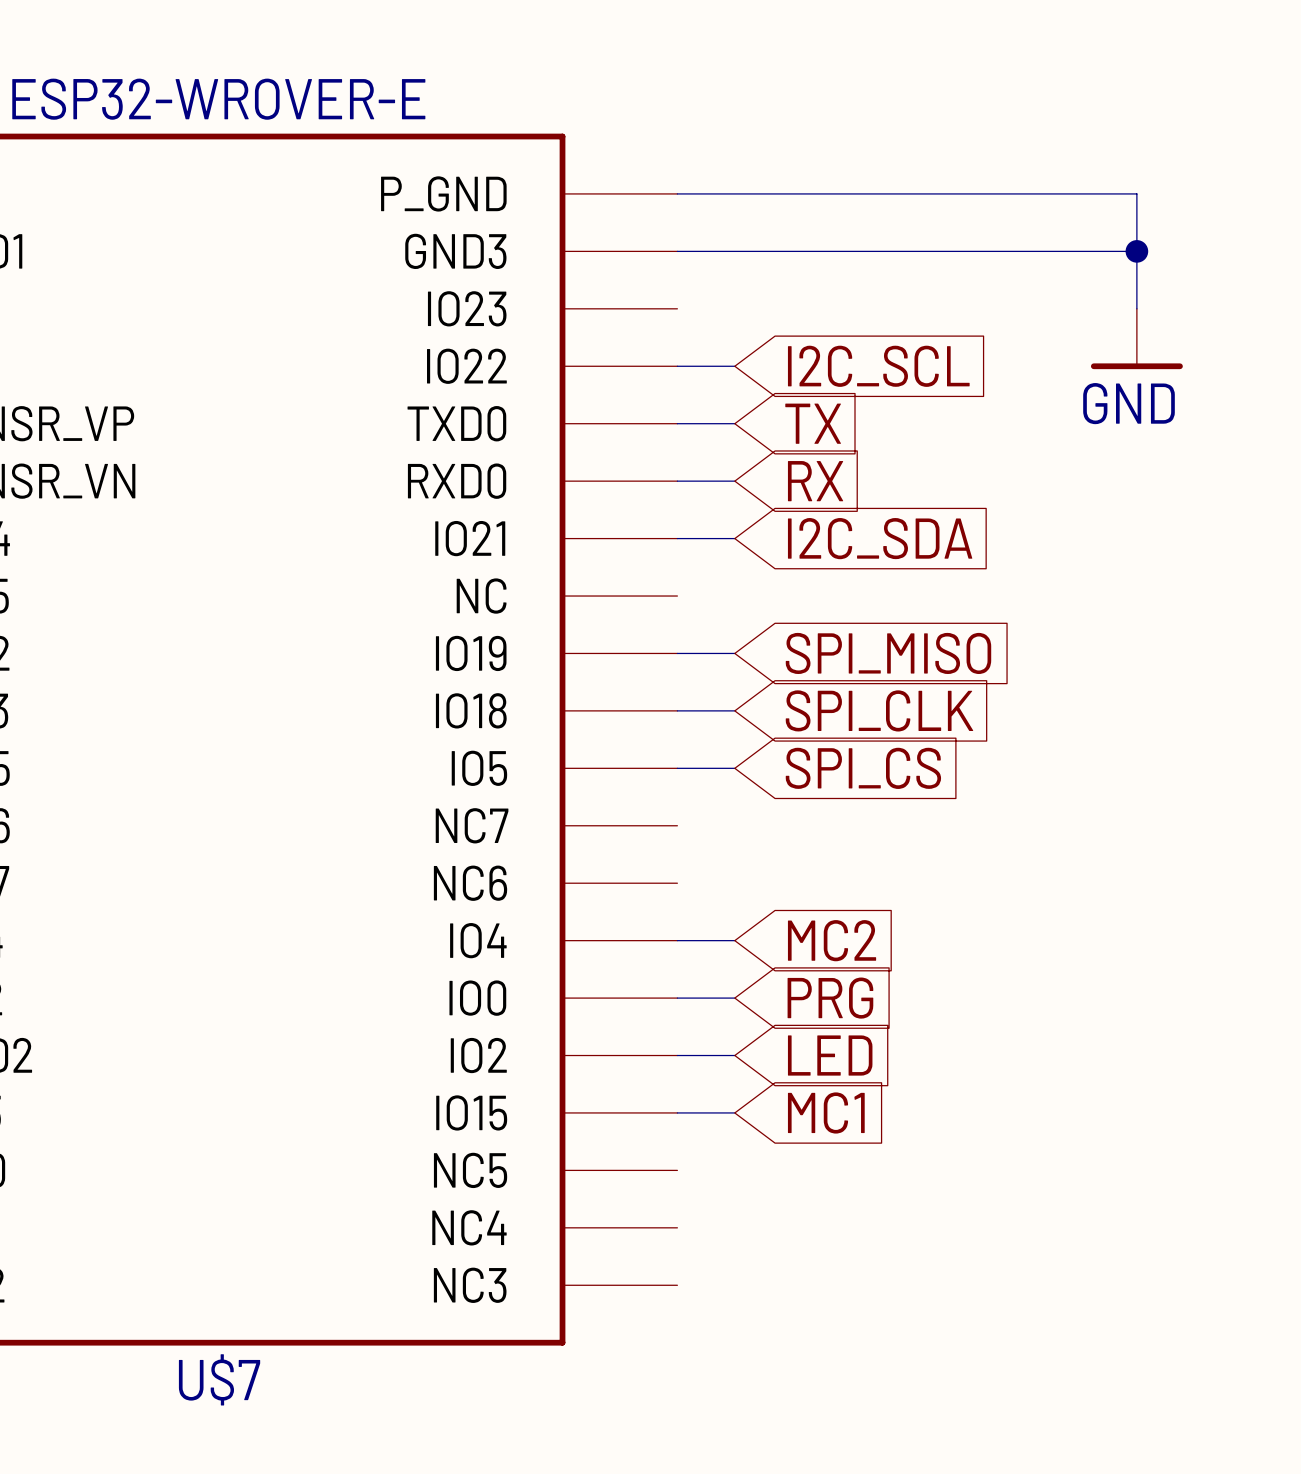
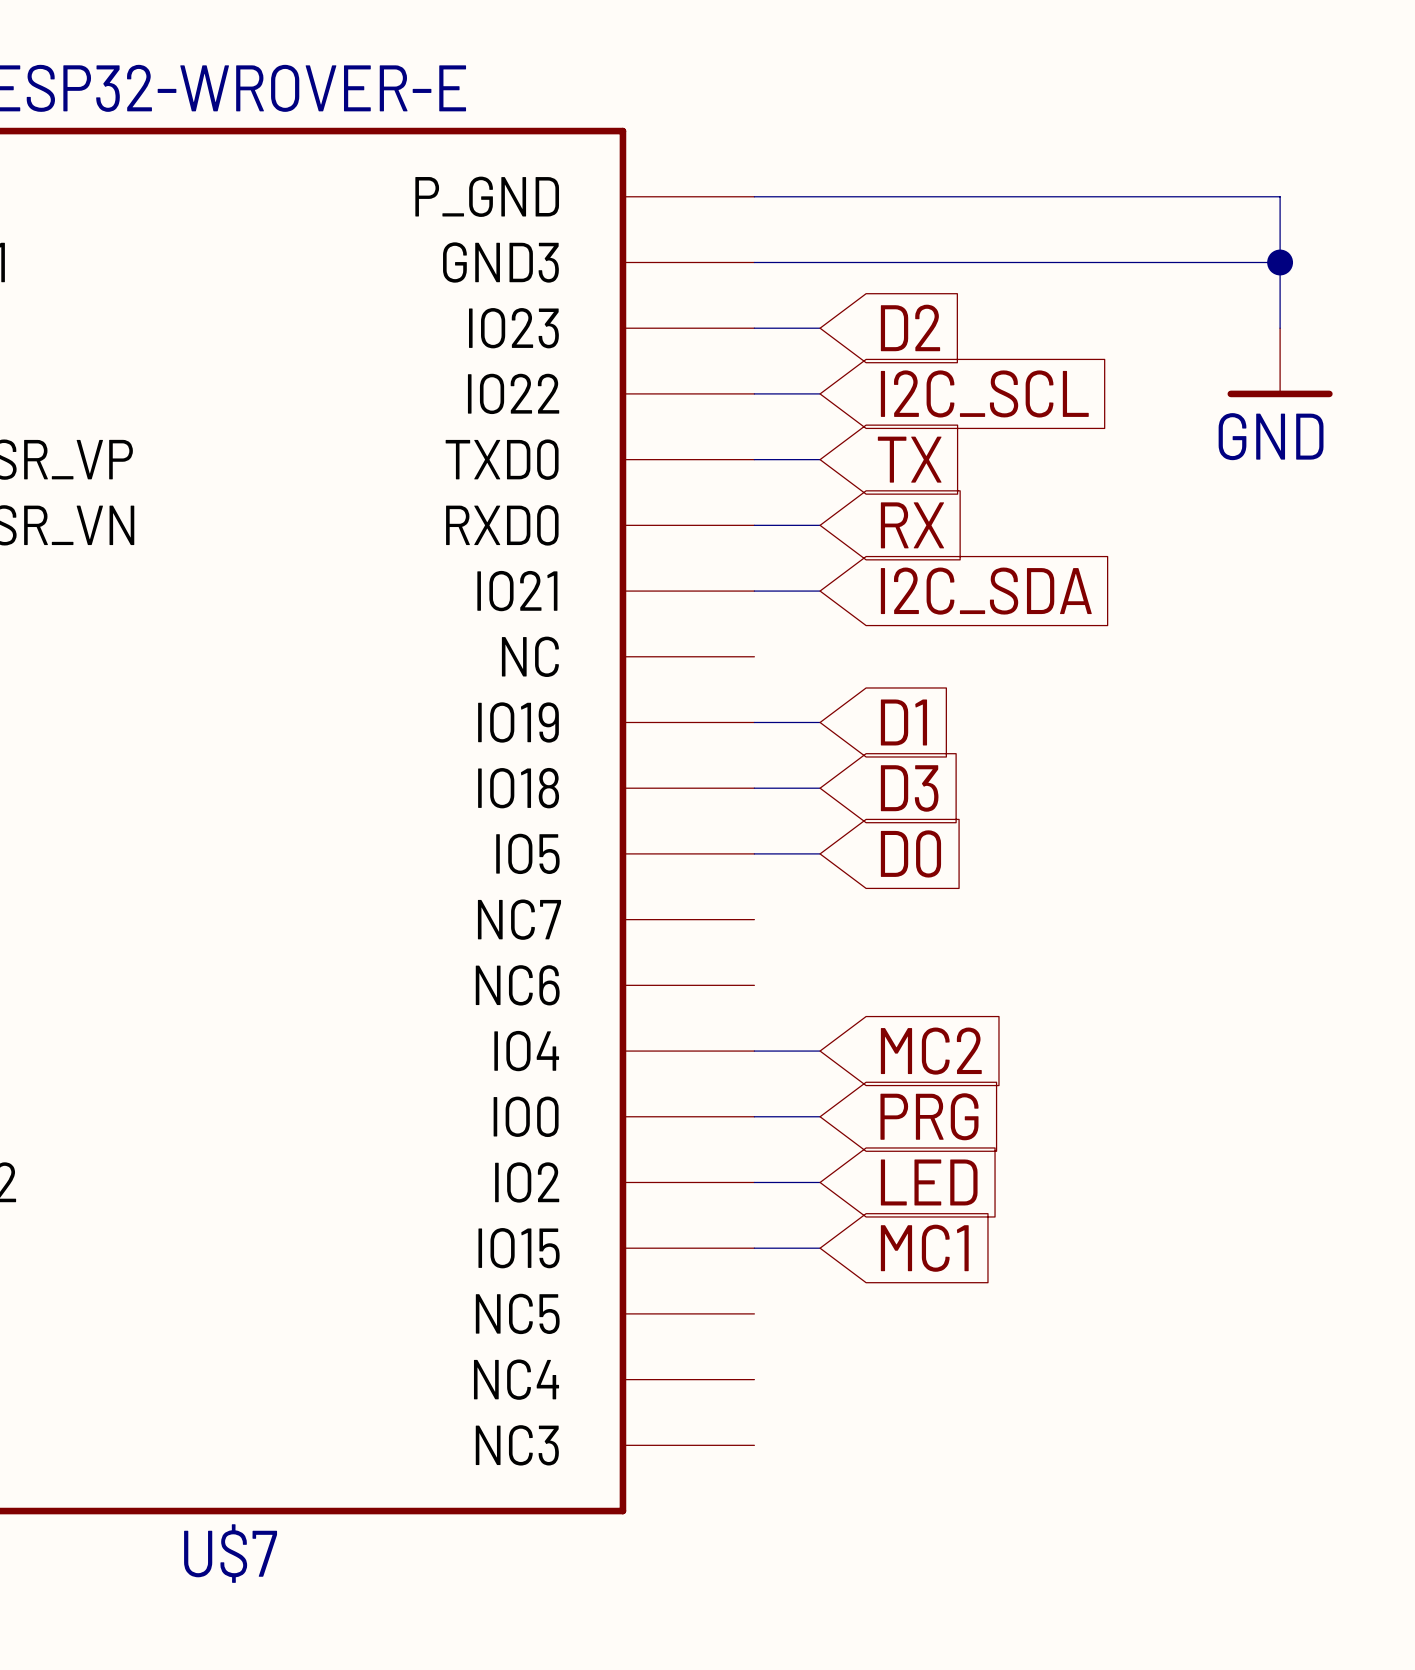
wire: none -> (754, 328) (820, 328)
global label: none -> D2 (910, 327)
global label: SPI_MISO (888, 653) -> D1 (903, 722)
global label: SPI_CLK (879, 710) -> D3 (909, 788)
global label: SPI_CS (863, 768) -> D0 (910, 853)

